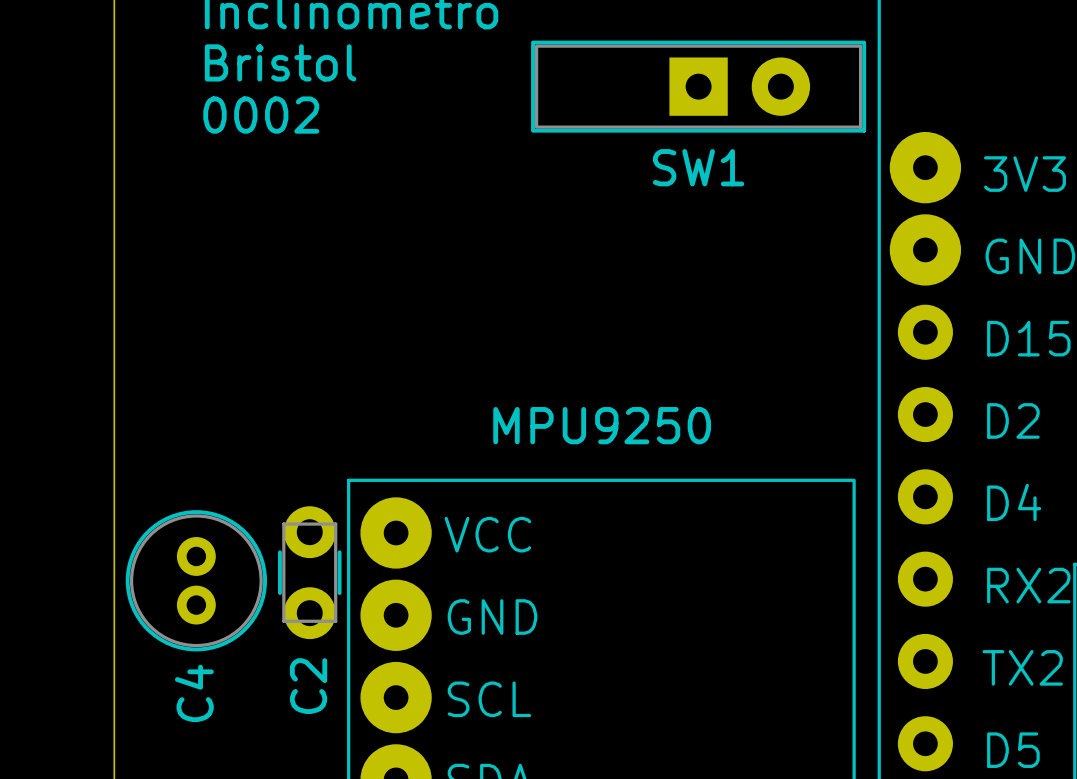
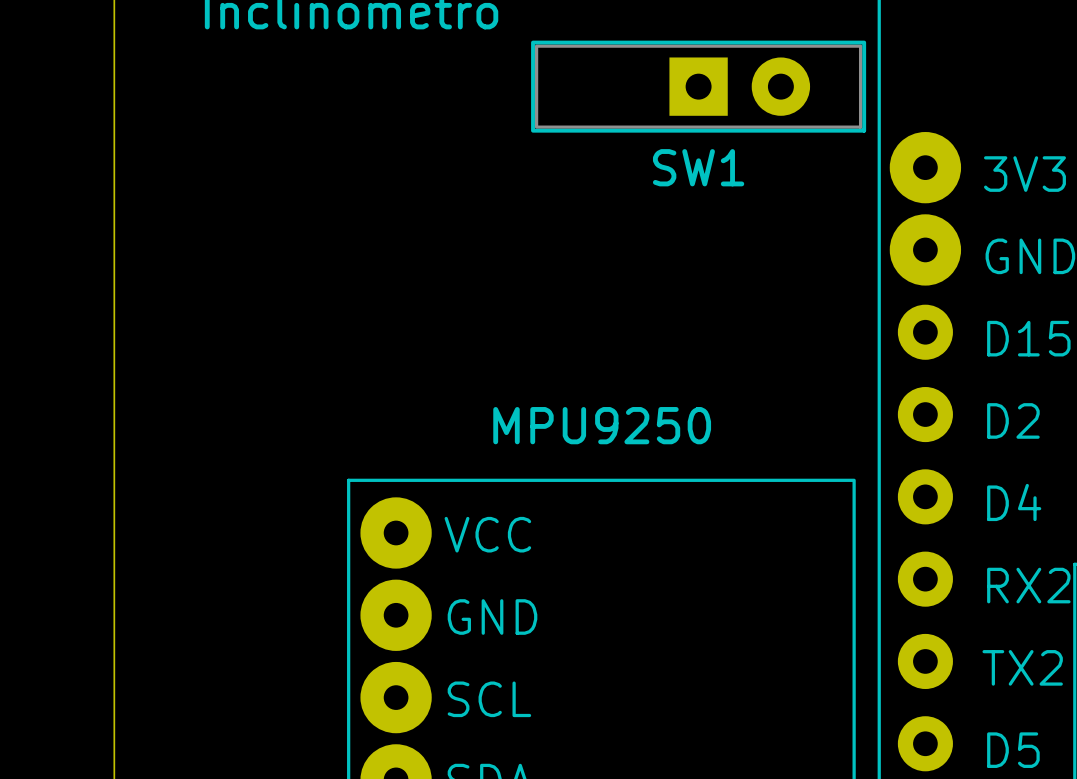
text: Bristol (280, 62) -> none
text: 0002 (261, 115) -> none
C2: (309, 572) -> none
C4: (196, 580) -> none

